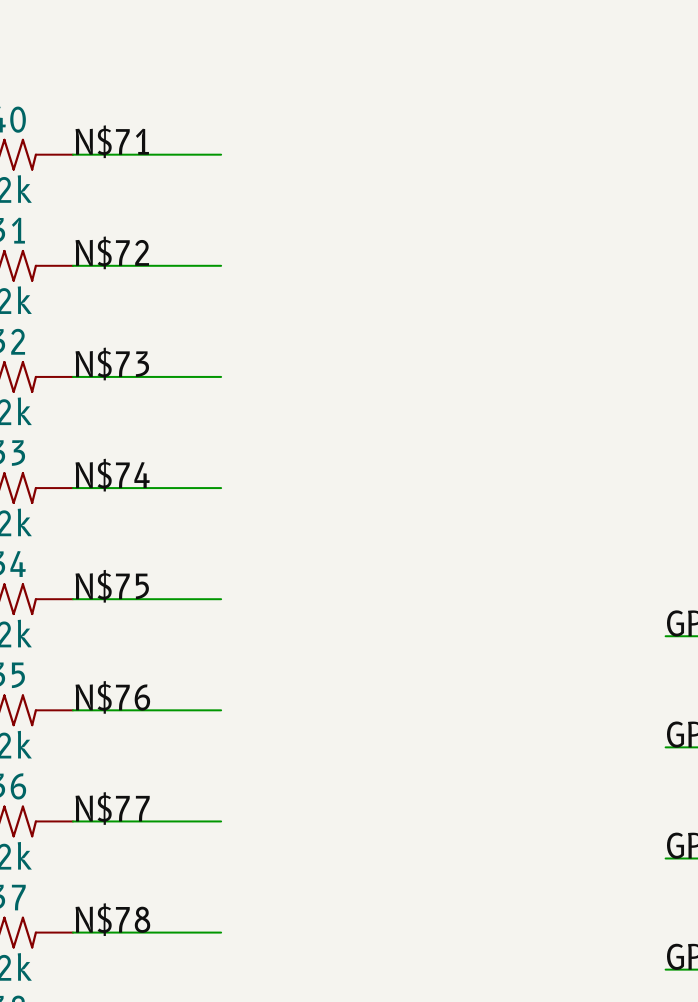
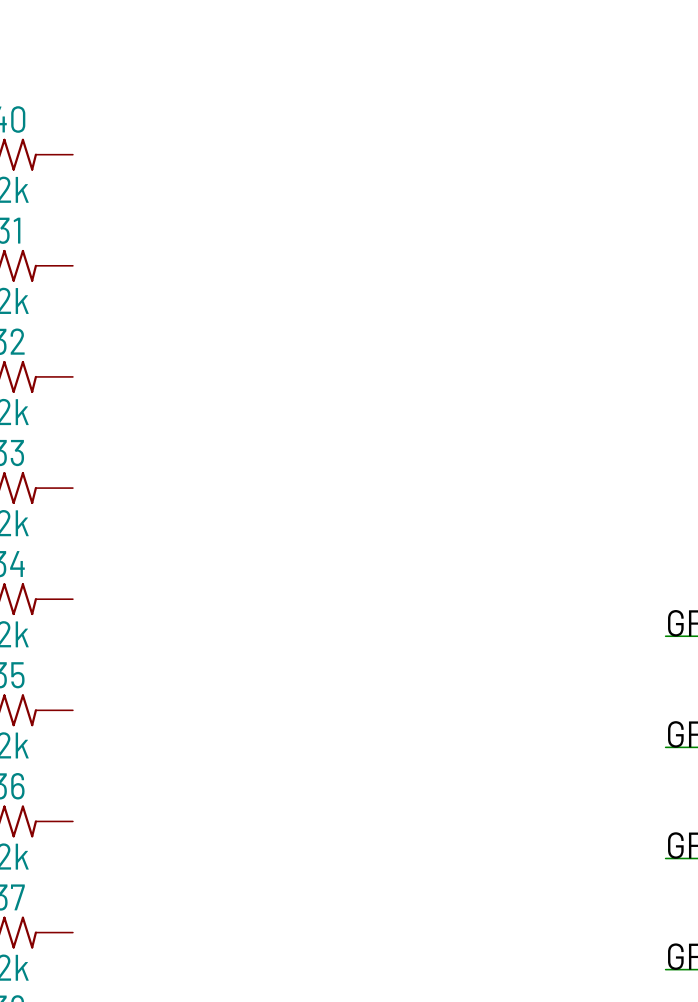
label: N$71 (112, 141) -> none
wire: (72, 154) (221, 154) -> none
label: N$72 (112, 252) -> none
wire: (72, 265) (221, 265) -> none
label: N$73 (112, 363) -> none
wire: (72, 376) (221, 376) -> none
label: N$74 (112, 475) -> none
wire: (72, 488) (221, 488) -> none
label: N$75 (112, 586) -> none
wire: (72, 599) (221, 599) -> none
label: N$76 (112, 697) -> none
wire: (72, 710) (221, 710) -> none
label: N$77 (112, 808) -> none
wire: (72, 821) (221, 821) -> none
label: N$78 (112, 919) -> none
wire: (72, 932) (221, 932) -> none

